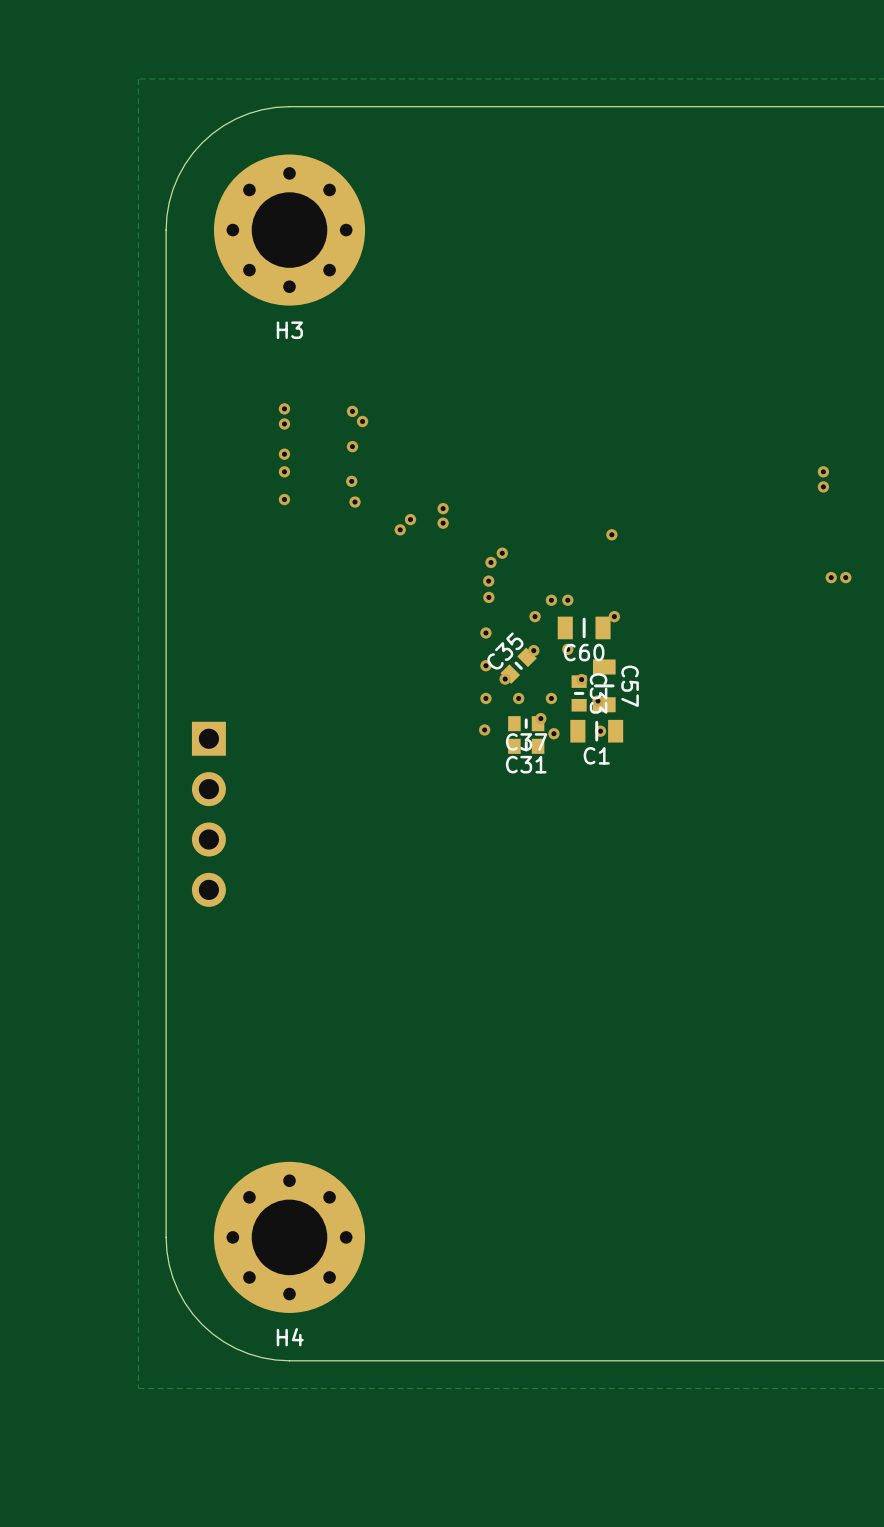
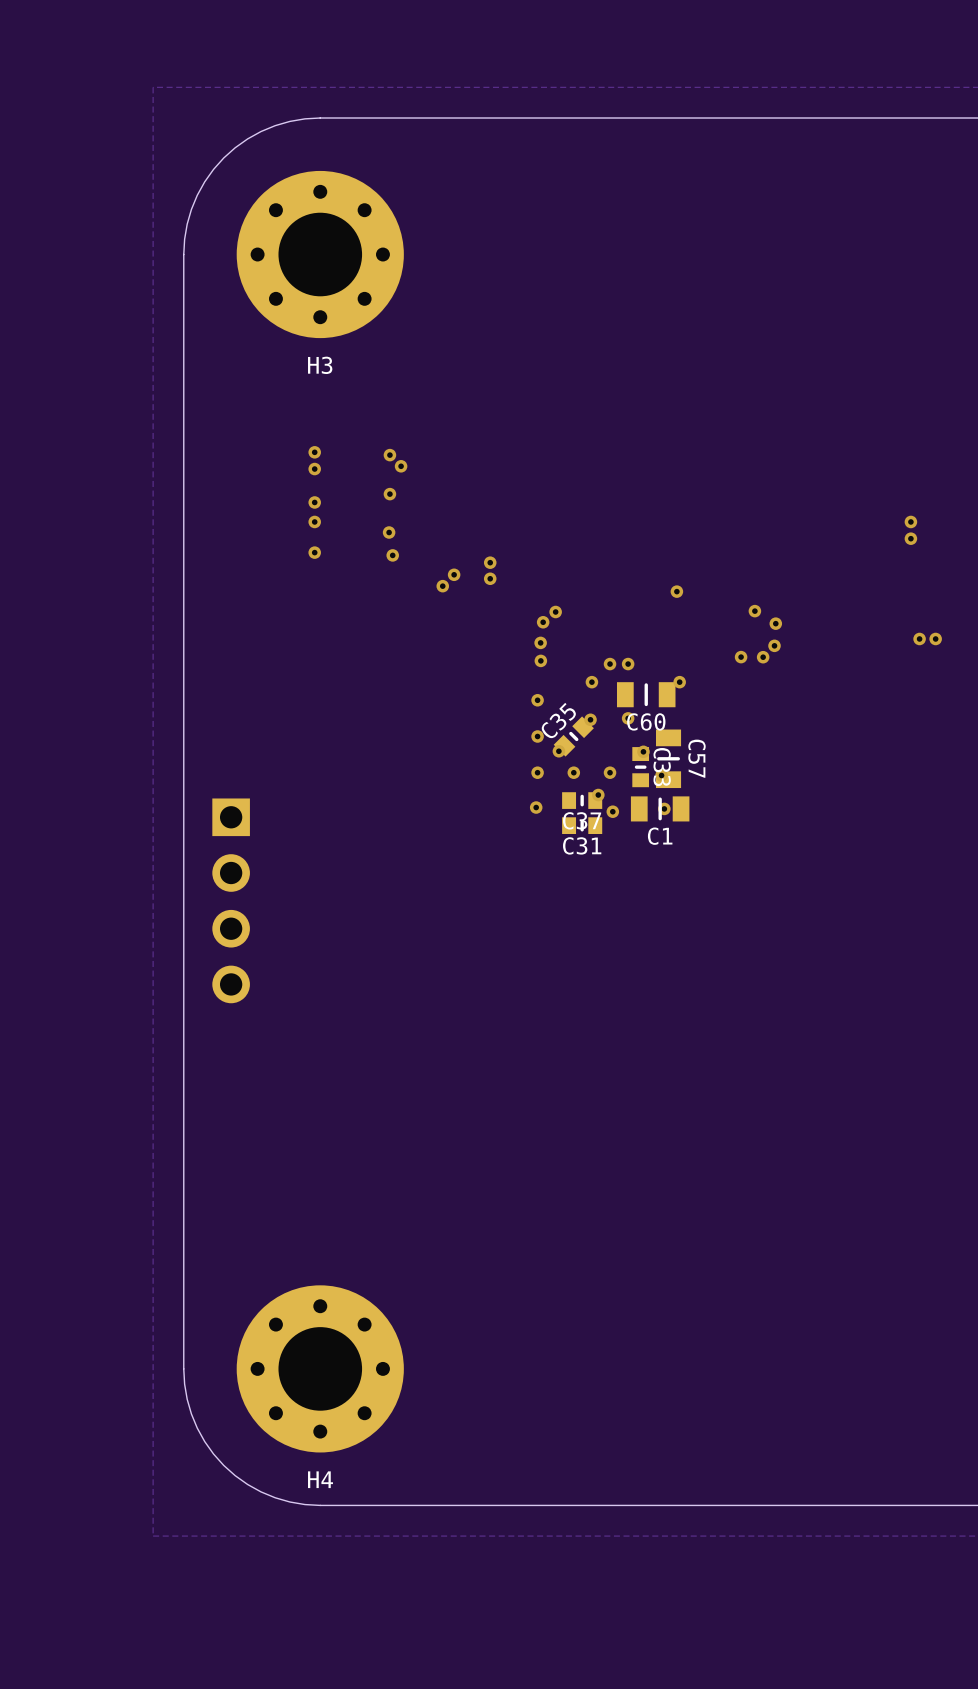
via: none -> (754, 611)
via: none -> (775, 623)
via: none -> (774, 645)
via: none -> (741, 657)
via: none -> (763, 657)

